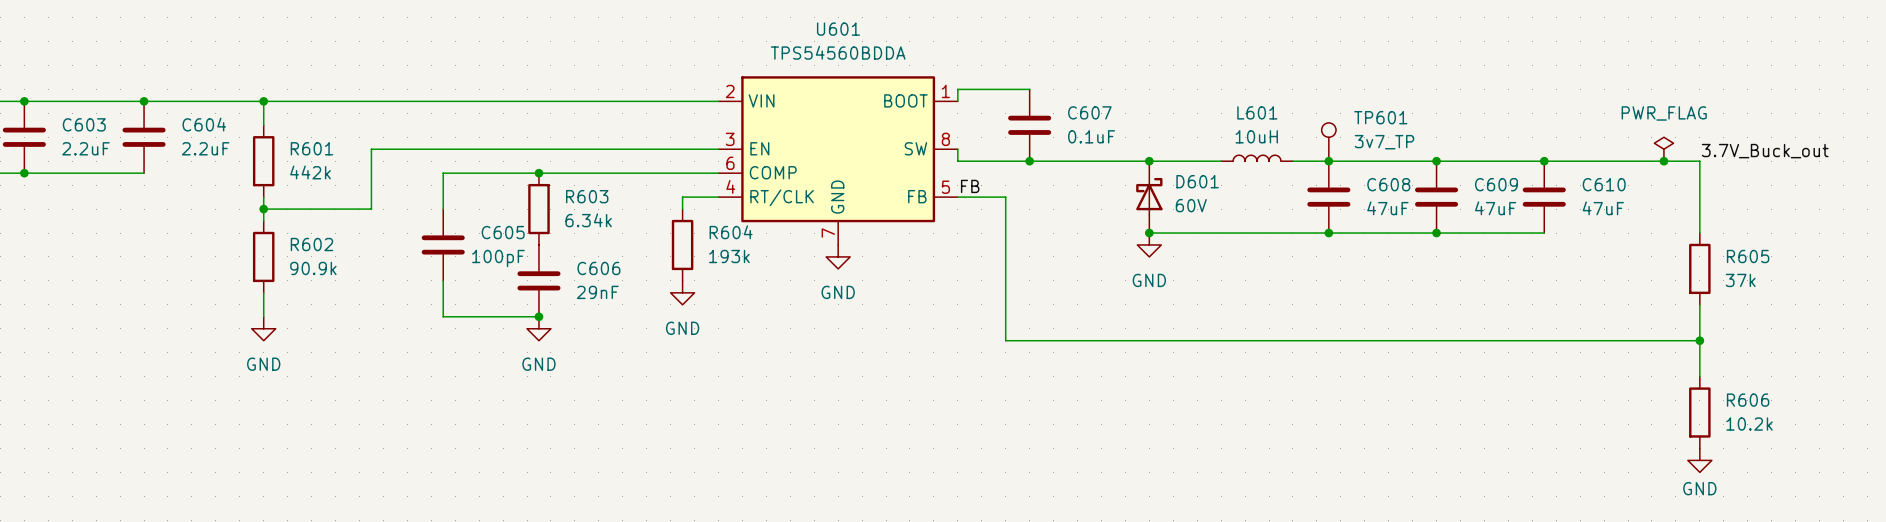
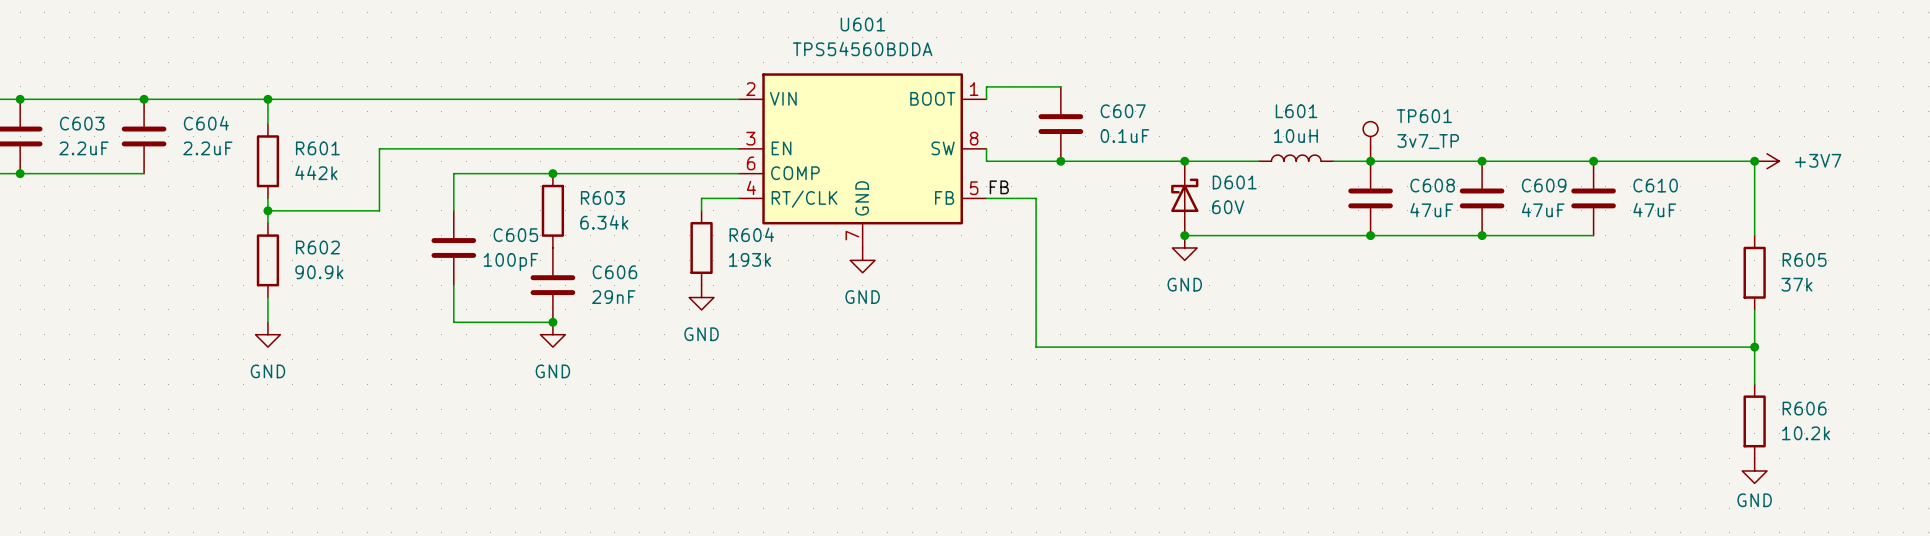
power symbol: PWR_FLAG (1663, 149) -> none
label: 3.7V_Buck_out (1765, 151) -> none
junction position: (1663, 161) -> (1754, 161)
power symbol: none -> +3V7 (1767, 161)

